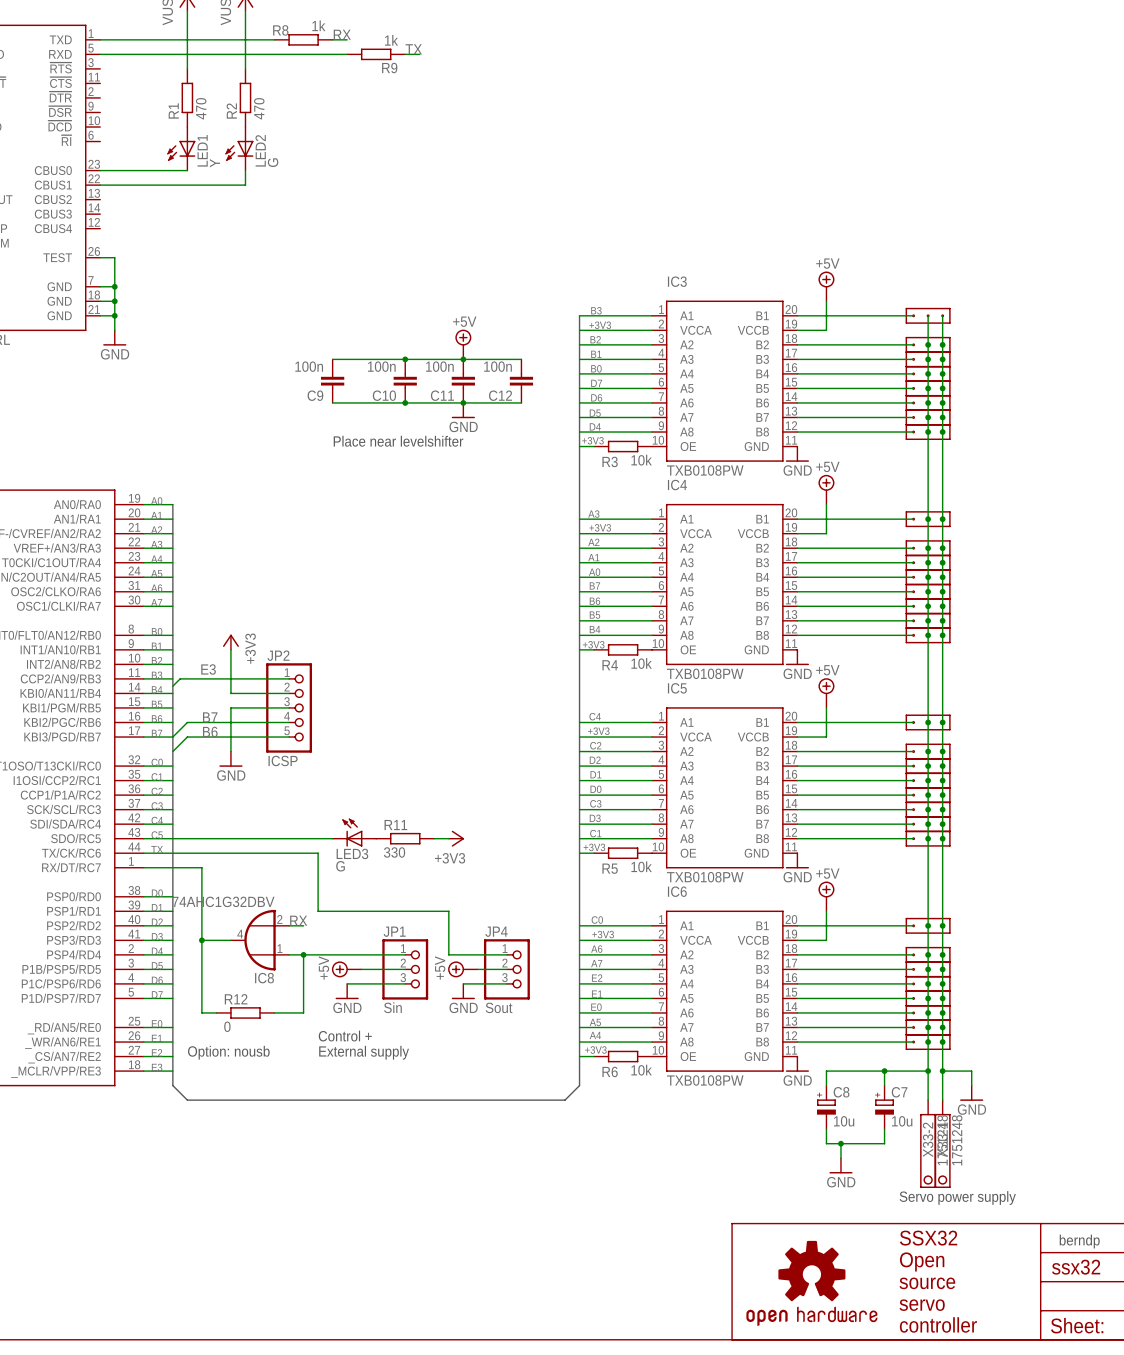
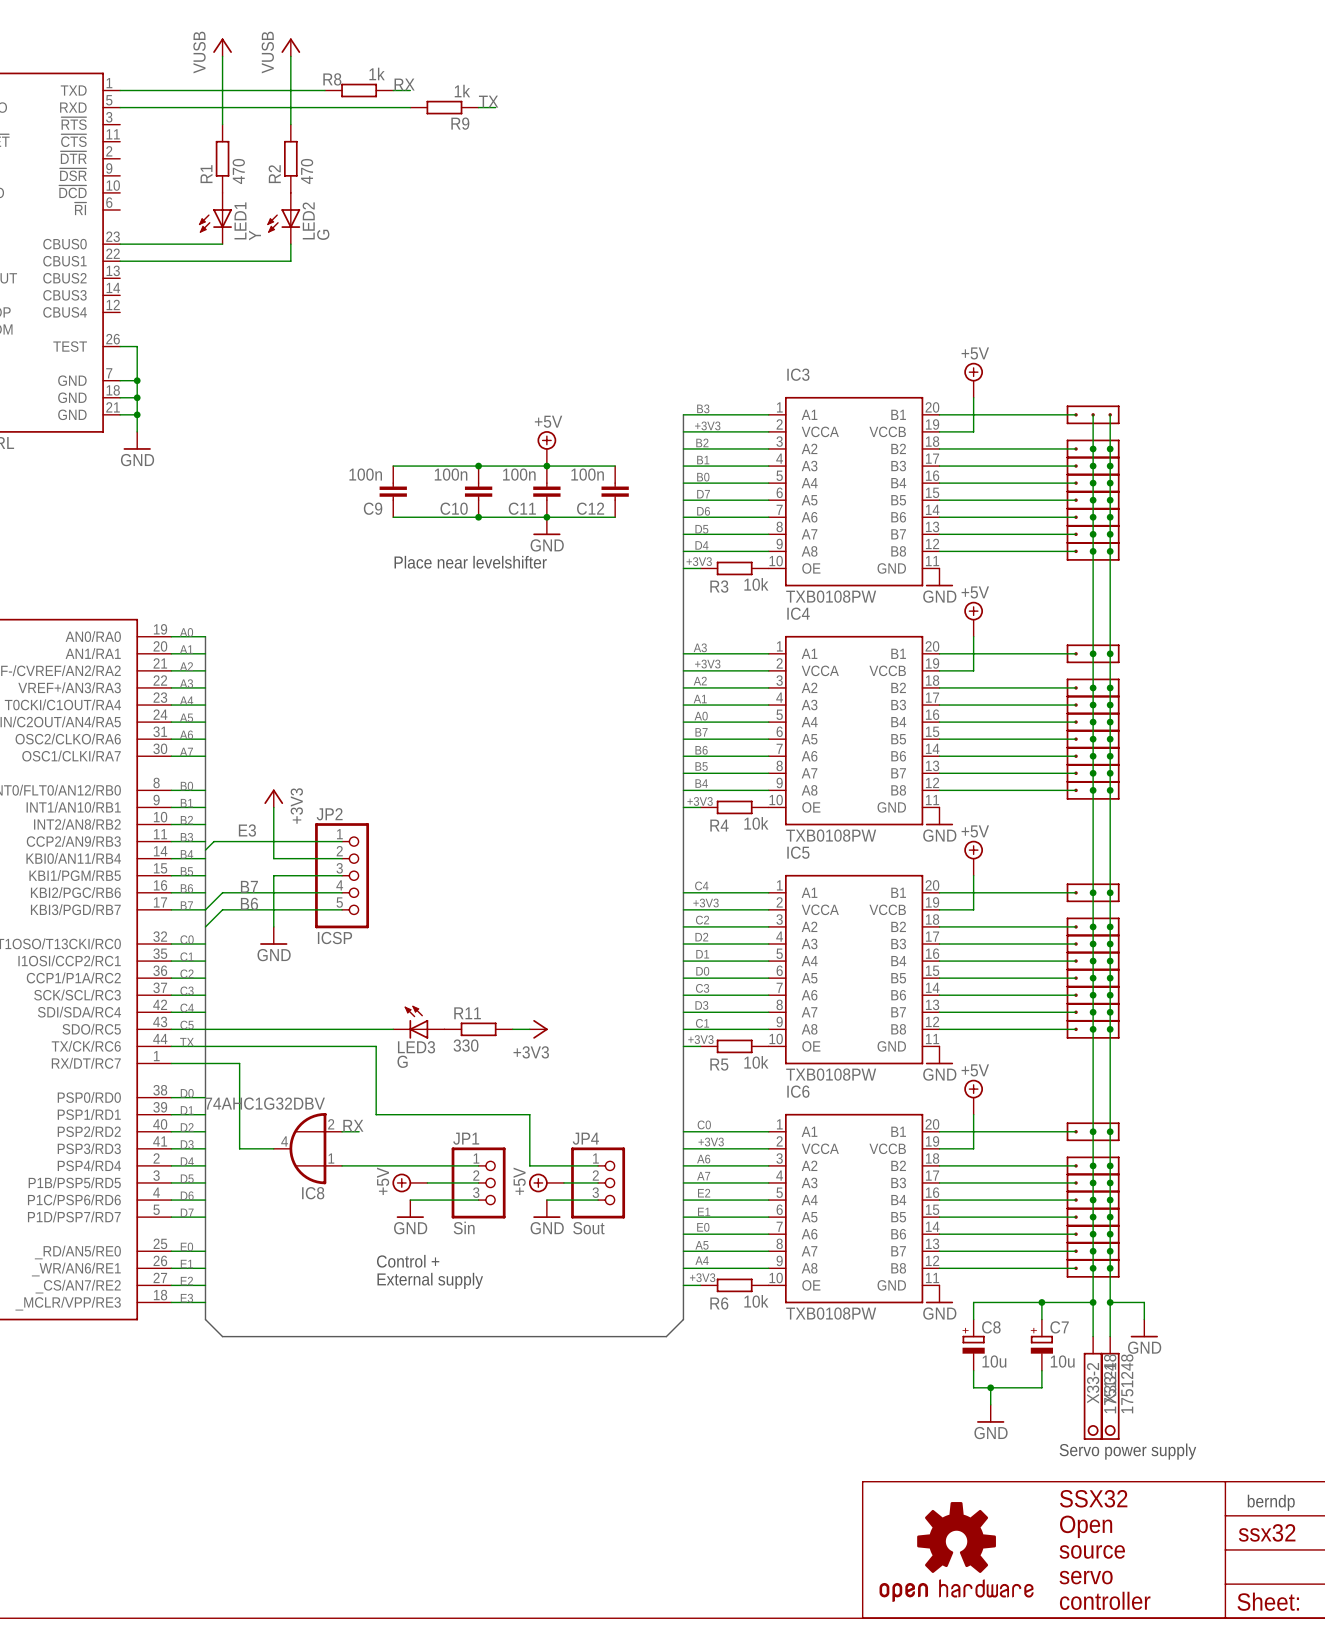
wire: (201, 940) (201, 1012) (216, 1012) -> none
junction: (201, 940) -> none
wire: (303, 954) (303, 1012) (274, 1012) -> none
junction: (303, 954) -> none
R12: 0 (245, 1012) -> none
text: Option: nousb (228, 1052) -> none

